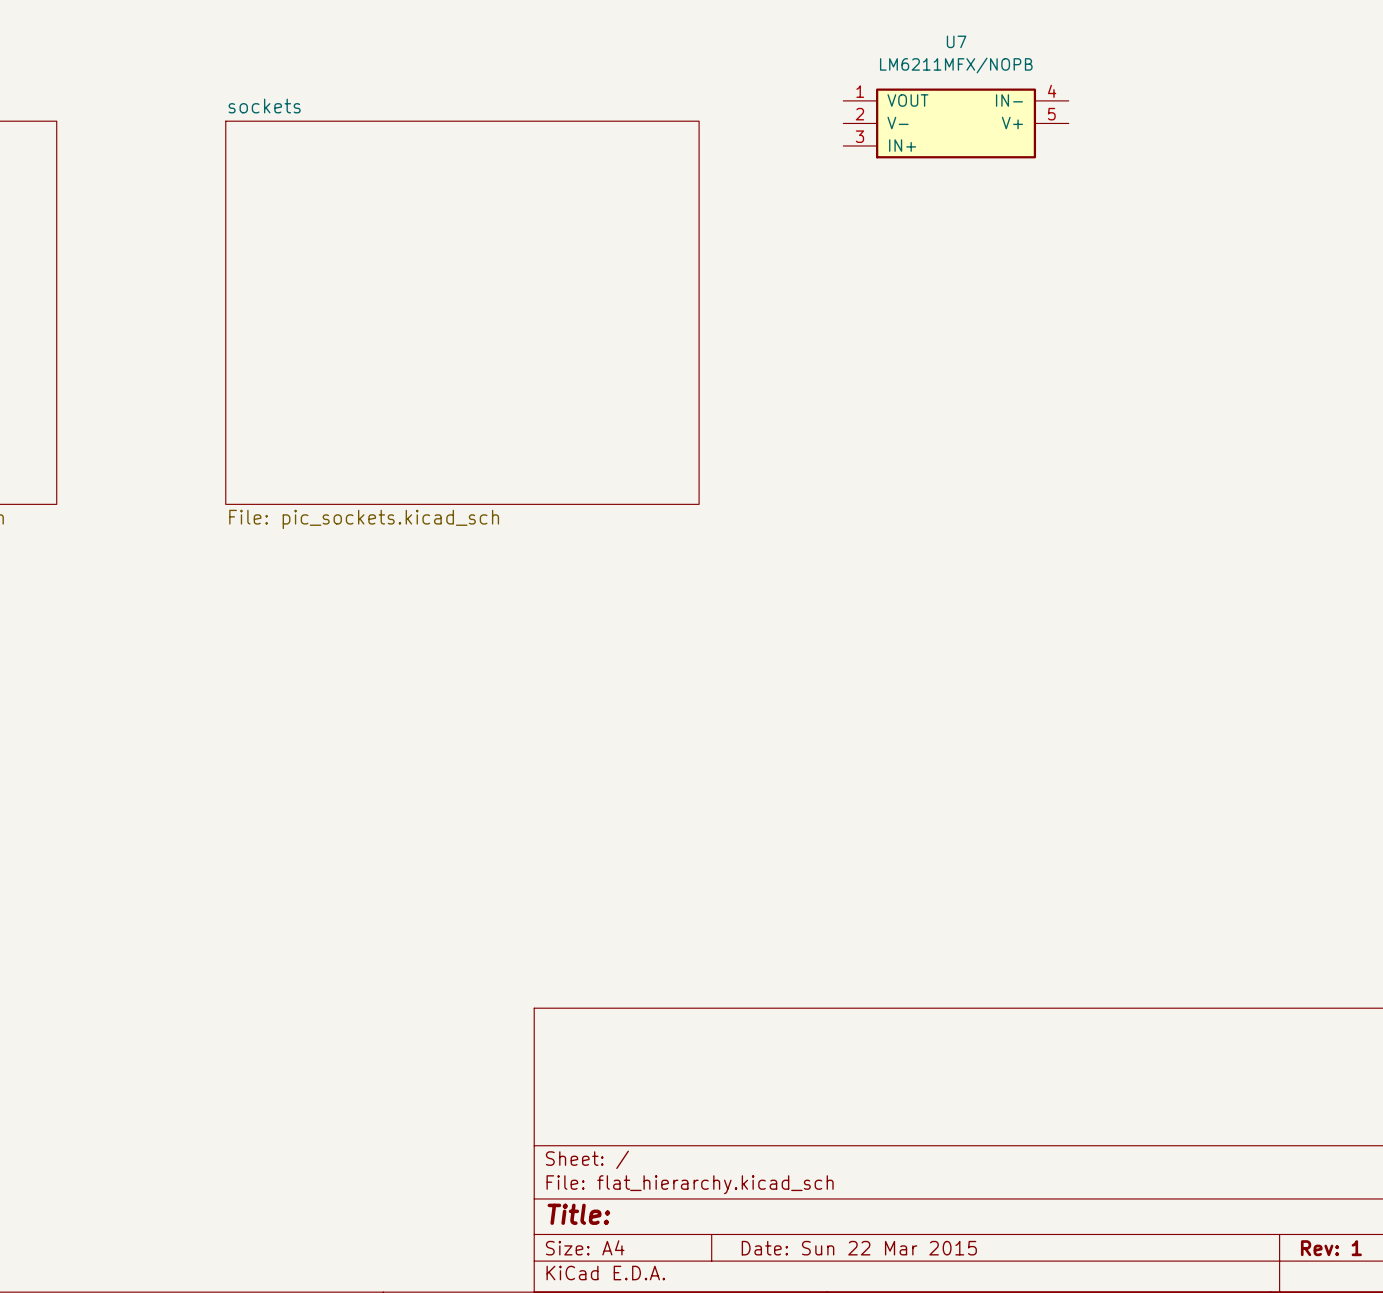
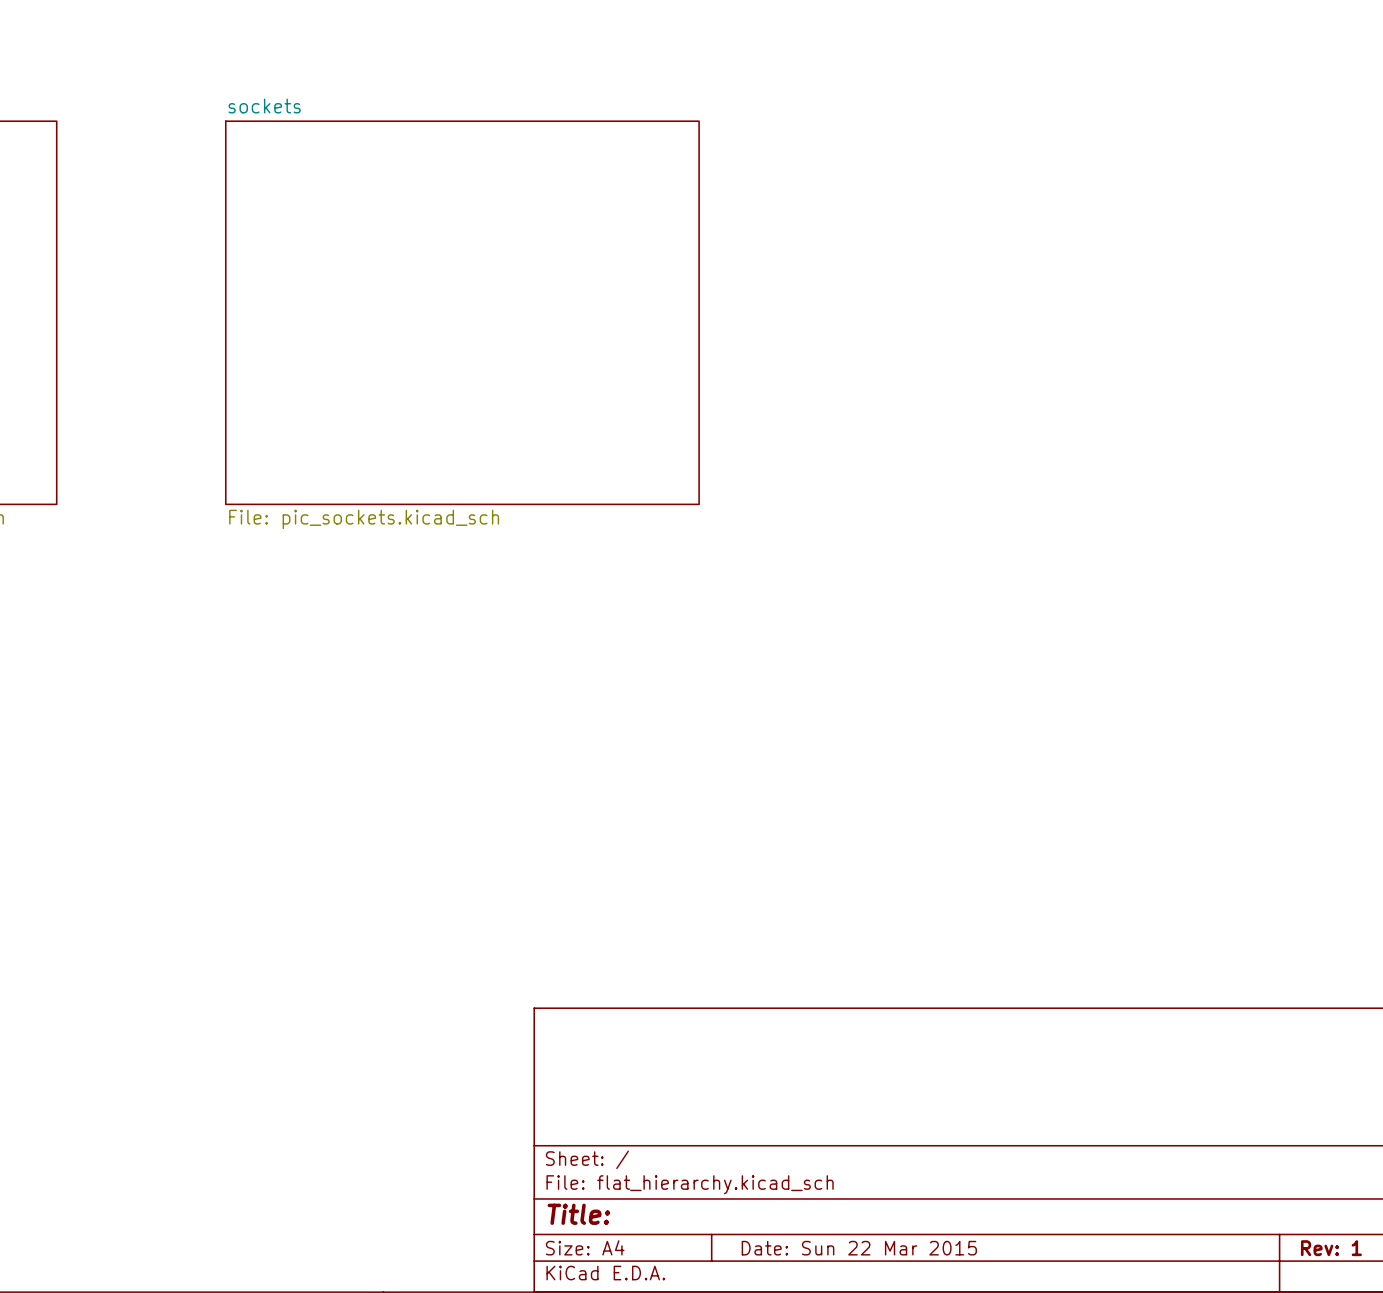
U7: LM6211MFX/NOPB (956, 123) -> none

